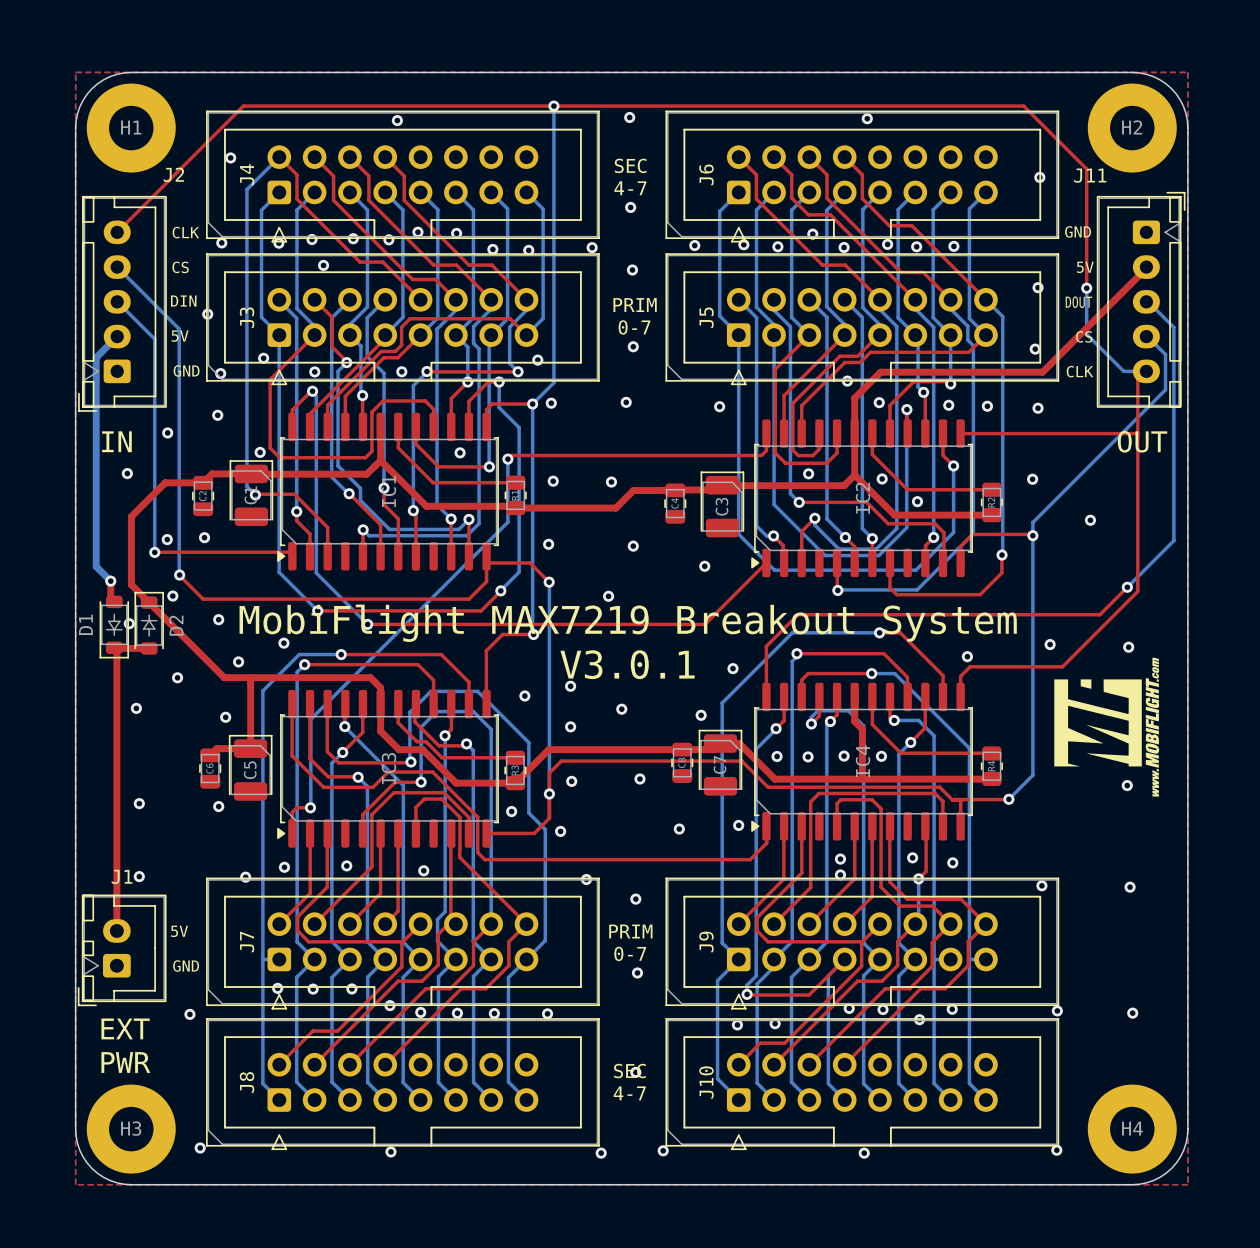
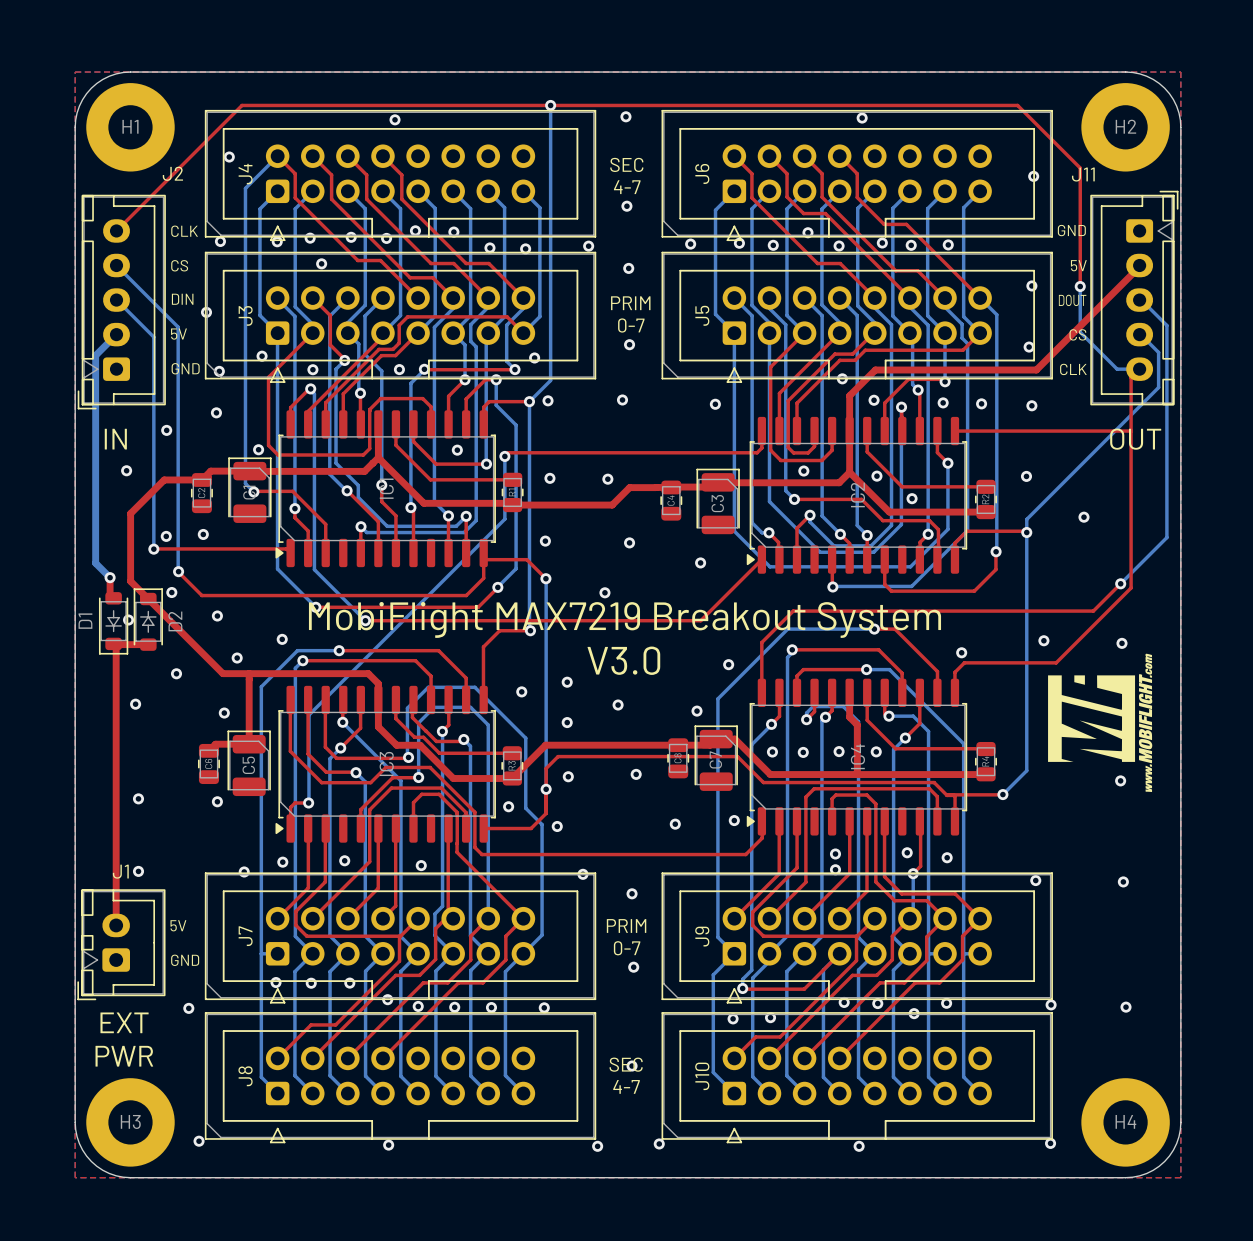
text: V3.0.1 (627, 664) -> V3.0 (623, 660)

